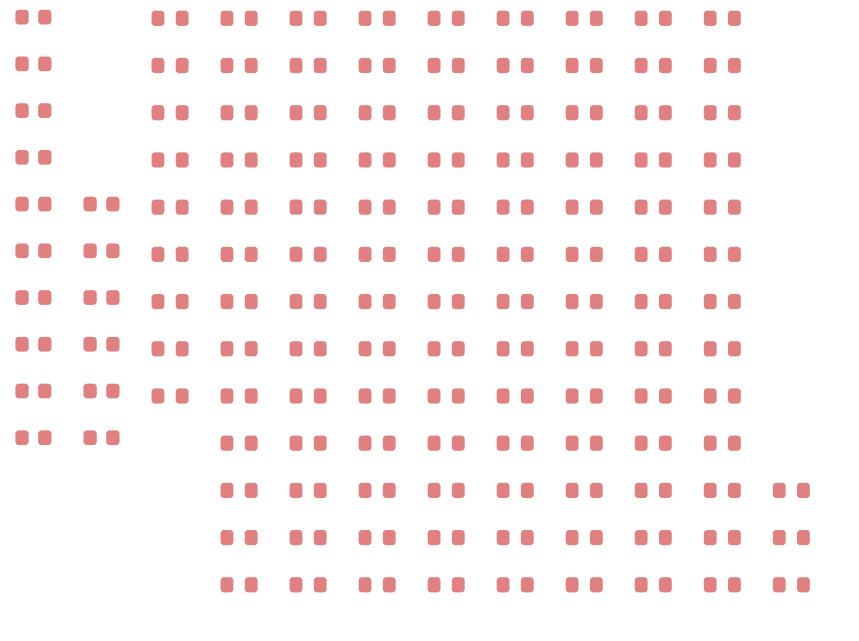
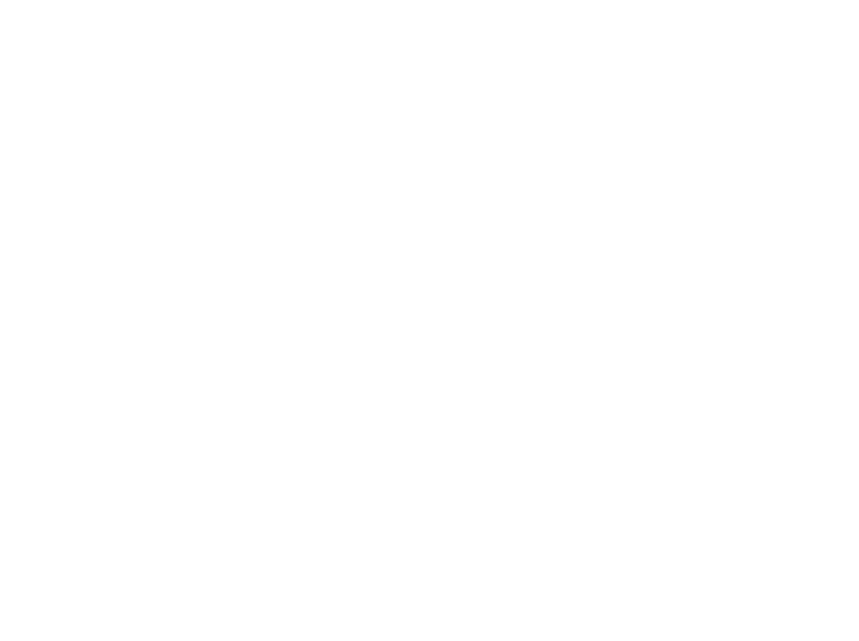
part: (33, 17) -> none
part: (170, 18) -> none
part: (239, 18) -> none
part: (308, 18) -> none
part: (377, 18) -> none
part: (446, 18) -> none
part: (515, 18) -> none
part: (584, 18) -> none
part: (653, 18) -> none
part: (722, 18) -> none
part: (33, 63) -> none
part: (170, 65) -> none
part: (239, 65) -> none
part: (308, 65) -> none
part: (377, 65) -> none
part: (446, 65) -> none
part: (515, 65) -> none
part: (584, 65) -> none
part: (653, 65) -> none
part: (722, 65) -> none
part: (33, 110) -> none
part: (170, 112) -> none
part: (239, 112) -> none
part: (308, 112) -> none
part: (377, 112) -> none
part: (446, 112) -> none
part: (515, 112) -> none
part: (584, 112) -> none
part: (653, 112) -> none
part: (722, 112) -> none
part: (33, 157) -> none
part: (170, 159) -> none
part: (239, 159) -> none
part: (308, 159) -> none
part: (377, 159) -> none
part: (446, 159) -> none
part: (515, 159) -> none
part: (584, 159) -> none
part: (653, 159) -> none
part: (722, 159) -> none
part: (33, 204) -> none
part: (101, 204) -> none
part: (170, 207) -> none
part: (239, 207) -> none
part: (308, 207) -> none
part: (377, 207) -> none
part: (446, 207) -> none
part: (515, 207) -> none
part: (584, 207) -> none
part: (653, 207) -> none
part: (722, 207) -> none
part: (33, 250) -> none
part: (101, 250) -> none
part: (170, 254) -> none
part: (239, 254) -> none
part: (308, 254) -> none
part: (377, 254) -> none
part: (446, 254) -> none
part: (515, 254) -> none
part: (584, 254) -> none
part: (653, 254) -> none
part: (722, 254) -> none
part: (33, 297) -> none
part: (101, 297) -> none
part: (170, 301) -> none
part: (239, 301) -> none
part: (308, 301) -> none
part: (377, 301) -> none
part: (446, 301) -> none
part: (515, 301) -> none
part: (584, 301) -> none
part: (653, 301) -> none
part: (722, 301) -> none
part: (33, 344) -> none
part: (101, 344) -> none
part: (170, 348) -> none
part: (239, 348) -> none
part: (308, 348) -> none
part: (377, 348) -> none
part: (446, 348) -> none
part: (515, 348) -> none
part: (584, 348) -> none
part: (653, 348) -> none
part: (722, 348) -> none
part: (33, 391) -> none
part: (101, 391) -> none
part: (170, 395) -> none
part: (239, 395) -> none
part: (308, 395) -> none
part: (377, 395) -> none
part: (446, 395) -> none
part: (515, 395) -> none
part: (584, 395) -> none
part: (653, 395) -> none
part: (722, 395) -> none
part: (33, 437) -> none
part: (101, 437) -> none
part: (239, 443) -> none
part: (308, 443) -> none
part: (377, 443) -> none
part: (446, 443) -> none
part: (515, 443) -> none
part: (584, 443) -> none
part: (653, 443) -> none
part: (722, 443) -> none
part: (239, 490) -> none
part: (308, 490) -> none
part: (377, 490) -> none
part: (446, 490) -> none
part: (515, 490) -> none
part: (584, 490) -> none
part: (653, 490) -> none
part: (722, 490) -> none
part: (791, 490) -> none
part: (239, 537) -> none
part: (308, 537) -> none
part: (377, 537) -> none
part: (446, 537) -> none
part: (515, 537) -> none
part: (584, 537) -> none
part: (653, 537) -> none
part: (722, 537) -> none
part: (791, 537) -> none
part: (239, 584) -> none
part: (308, 584) -> none
part: (377, 584) -> none
part: (446, 584) -> none
part: (515, 584) -> none
part: (584, 584) -> none
part: (653, 584) -> none
part: (722, 584) -> none
part: (791, 584) -> none

